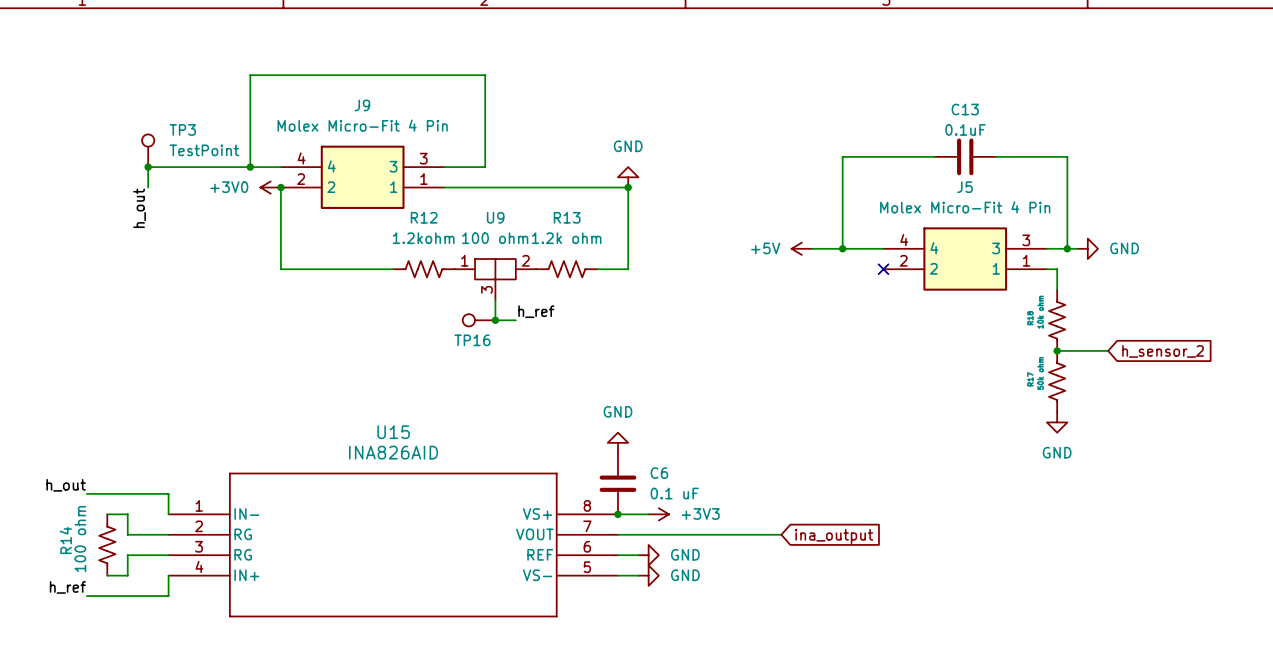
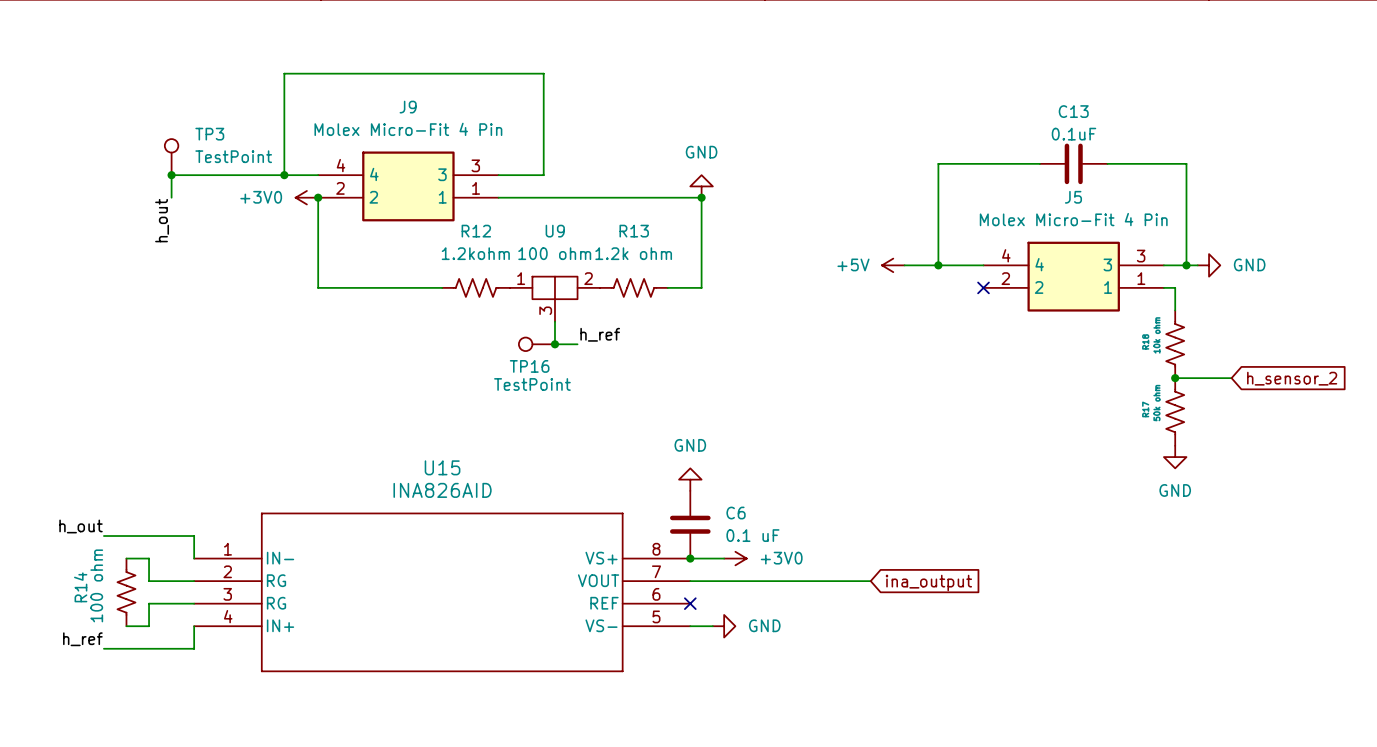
TP16 value: none -> TestPoint (532, 384)
power symbol: +3V3 (658, 514) -> +3V0 (735, 558)
wire: (617, 555) (638, 555) -> none
no-connect mark: none -> (690, 603)
power symbol: GND (648, 555) -> none

